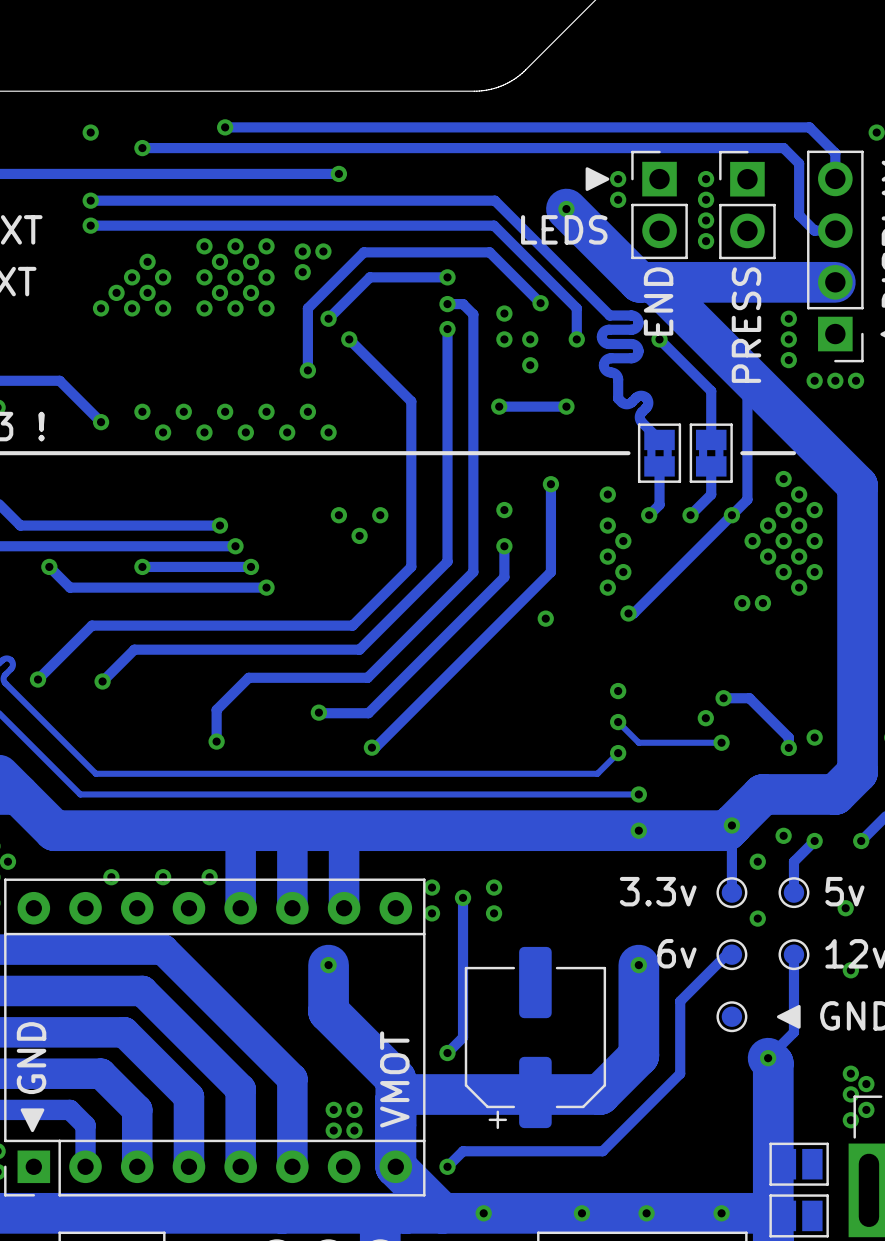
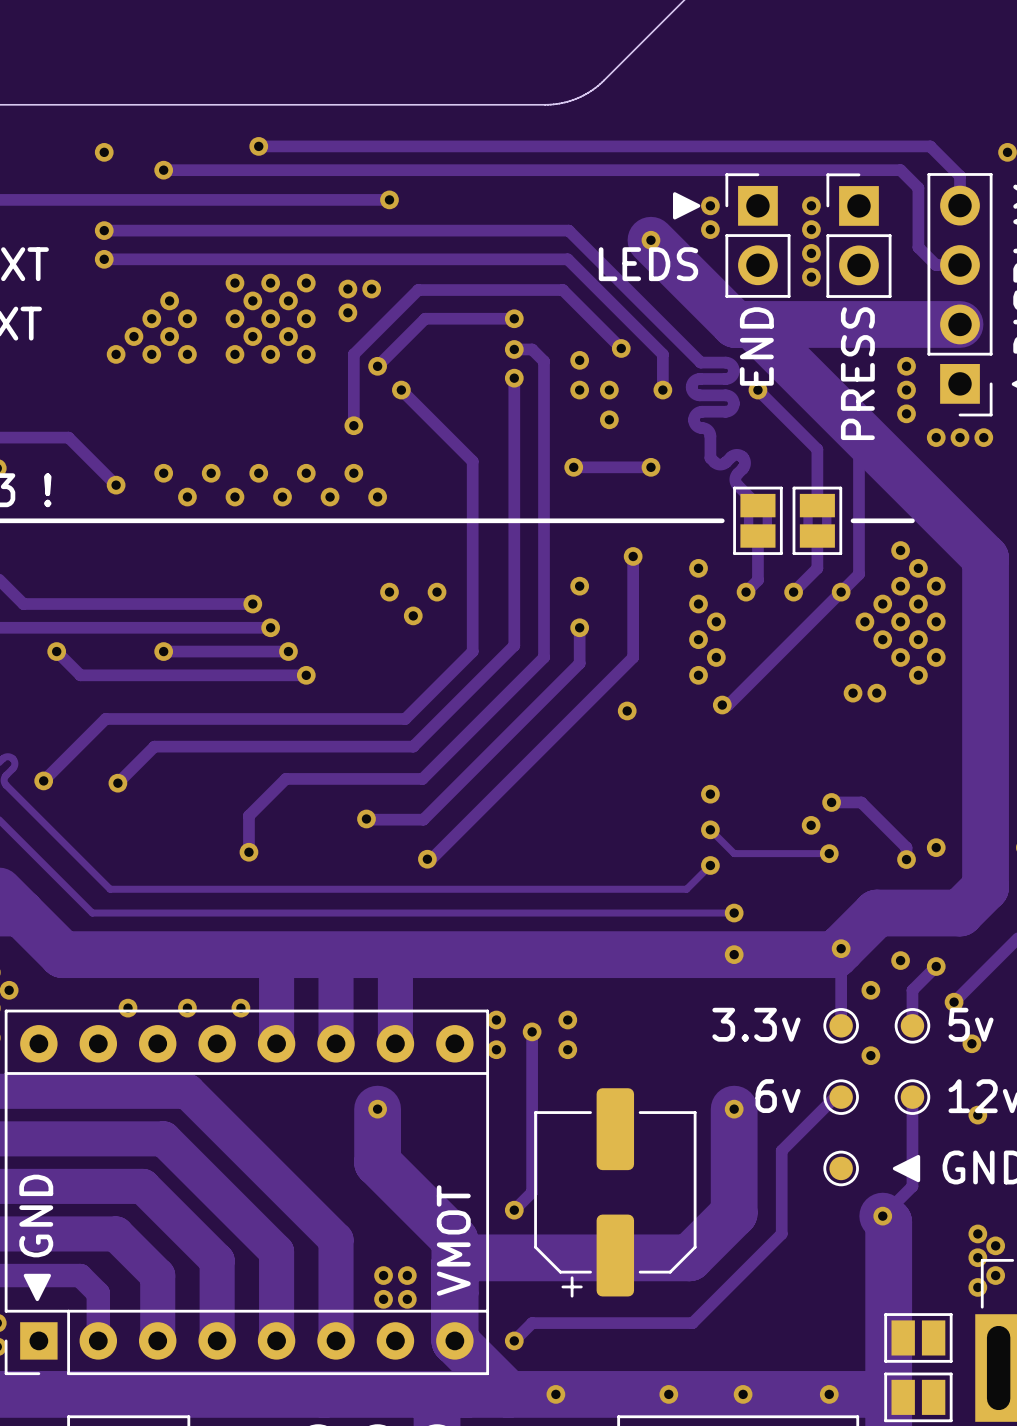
track: none -> (989, 966) (954, 1002)
via position: (861, 841) -> (954, 1002)

